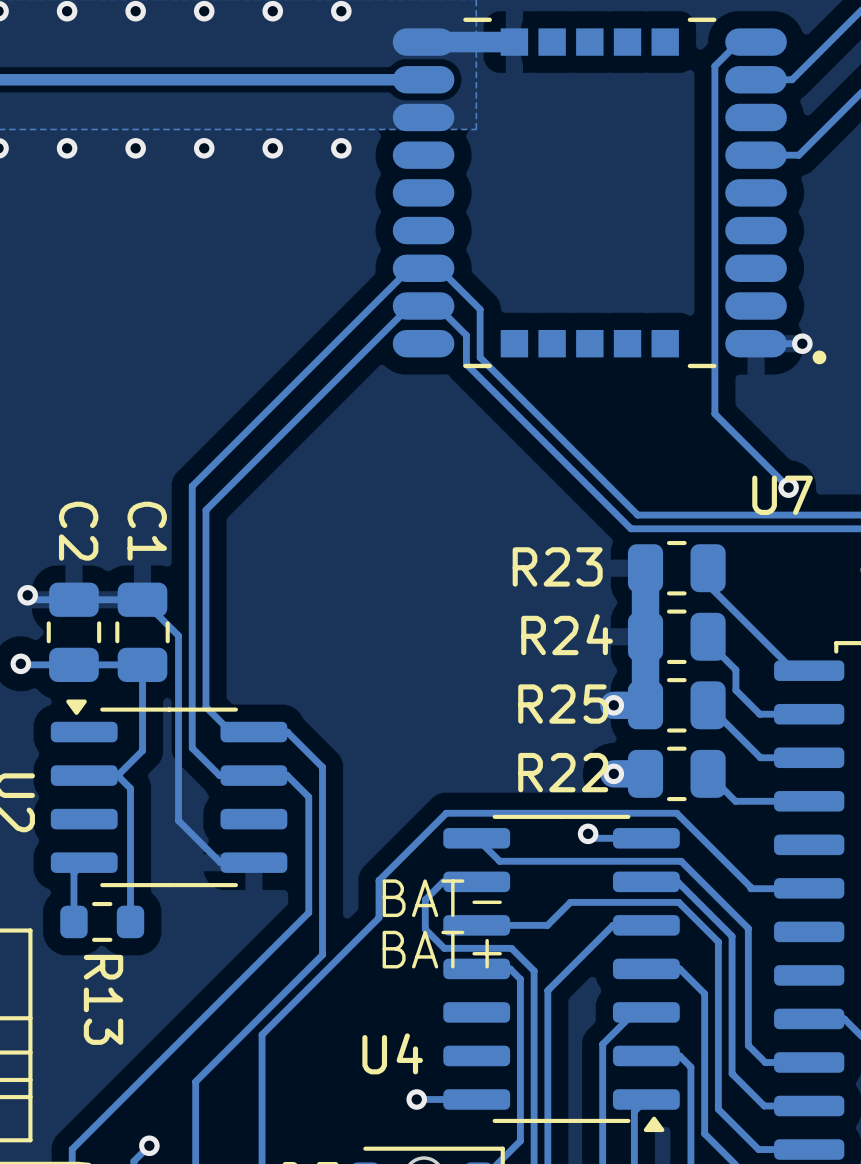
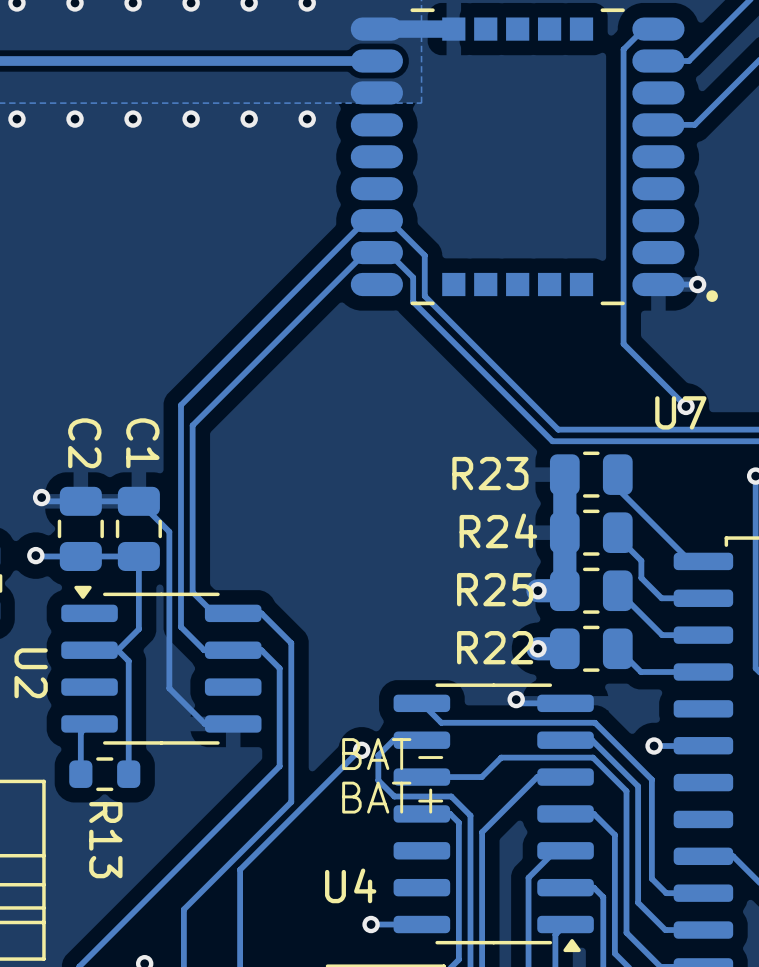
track: (750, 888) (676, 813) (446, 813) (379, 880) (379, 917) -> (361, 750) (339, 770)
via: none -> (654, 746)
via: none -> (361, 750)

